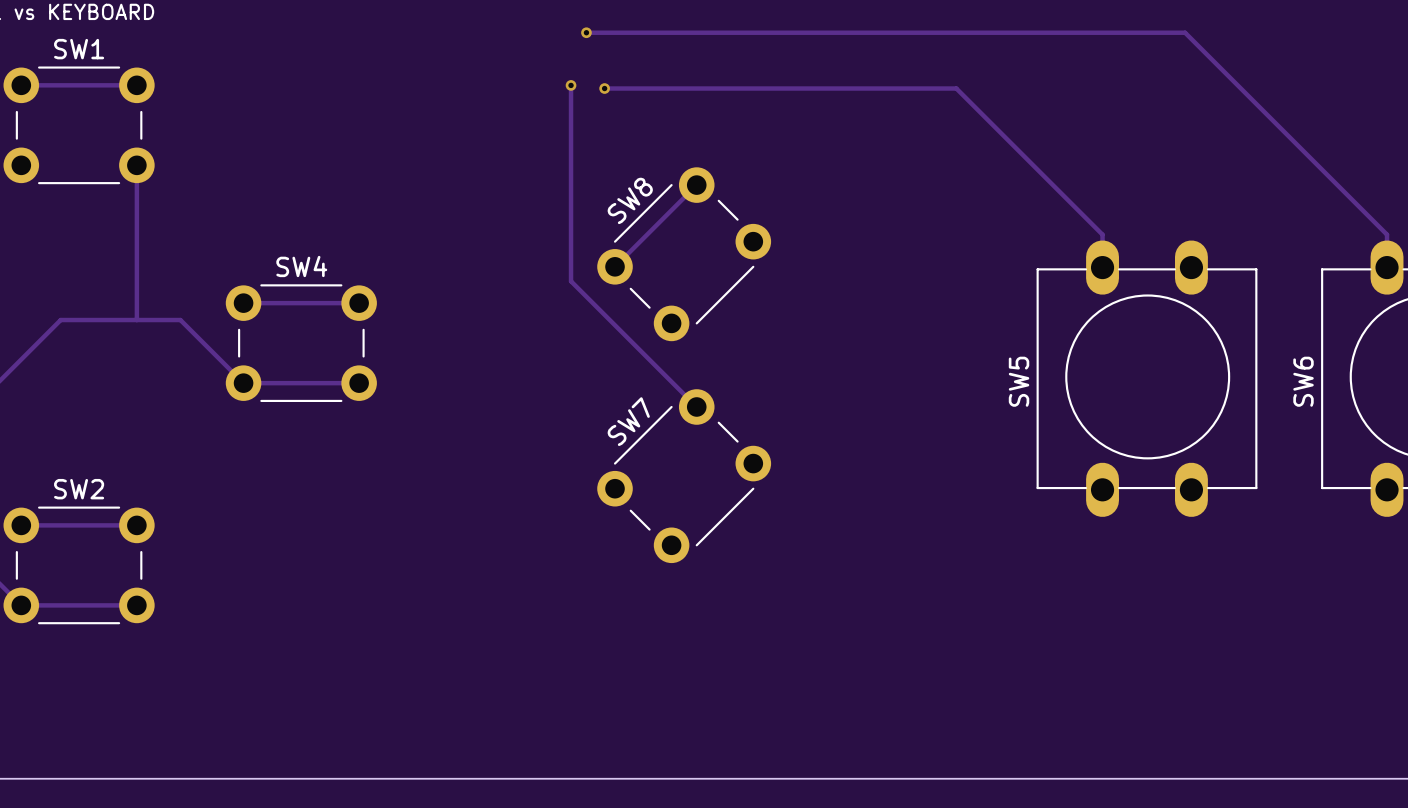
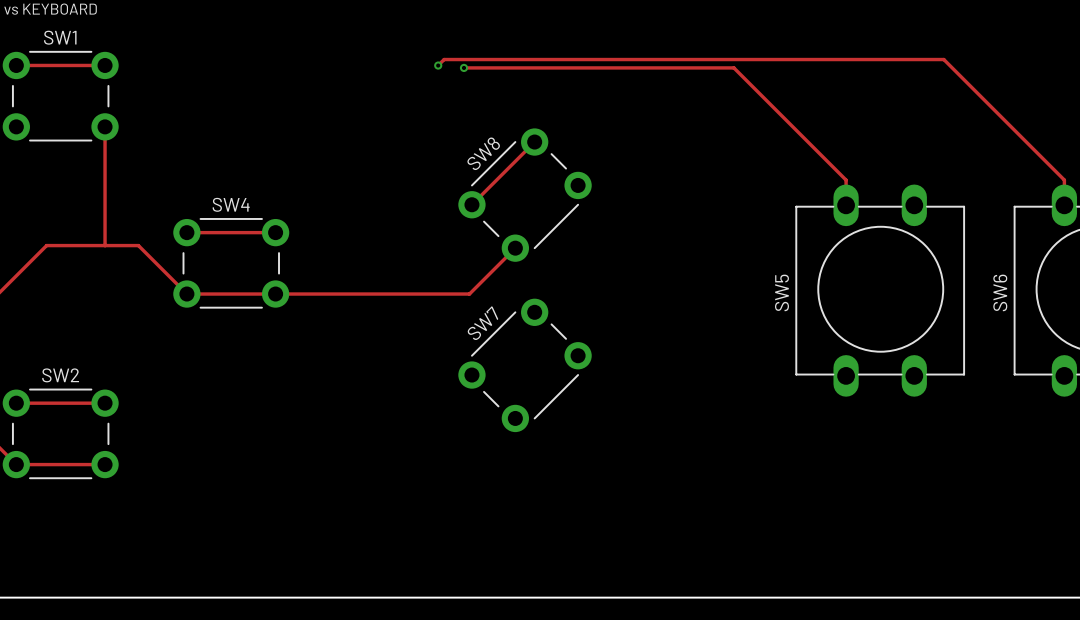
track: (586, 32) (1185, 32) (1229, 77) -> (438, 65) (444, 59) (943, 59)
via: (586, 32) -> none
track: (571, 85) (571, 281) (696, 406) -> none
track: none -> (515, 248) (469, 294) (275, 294)

